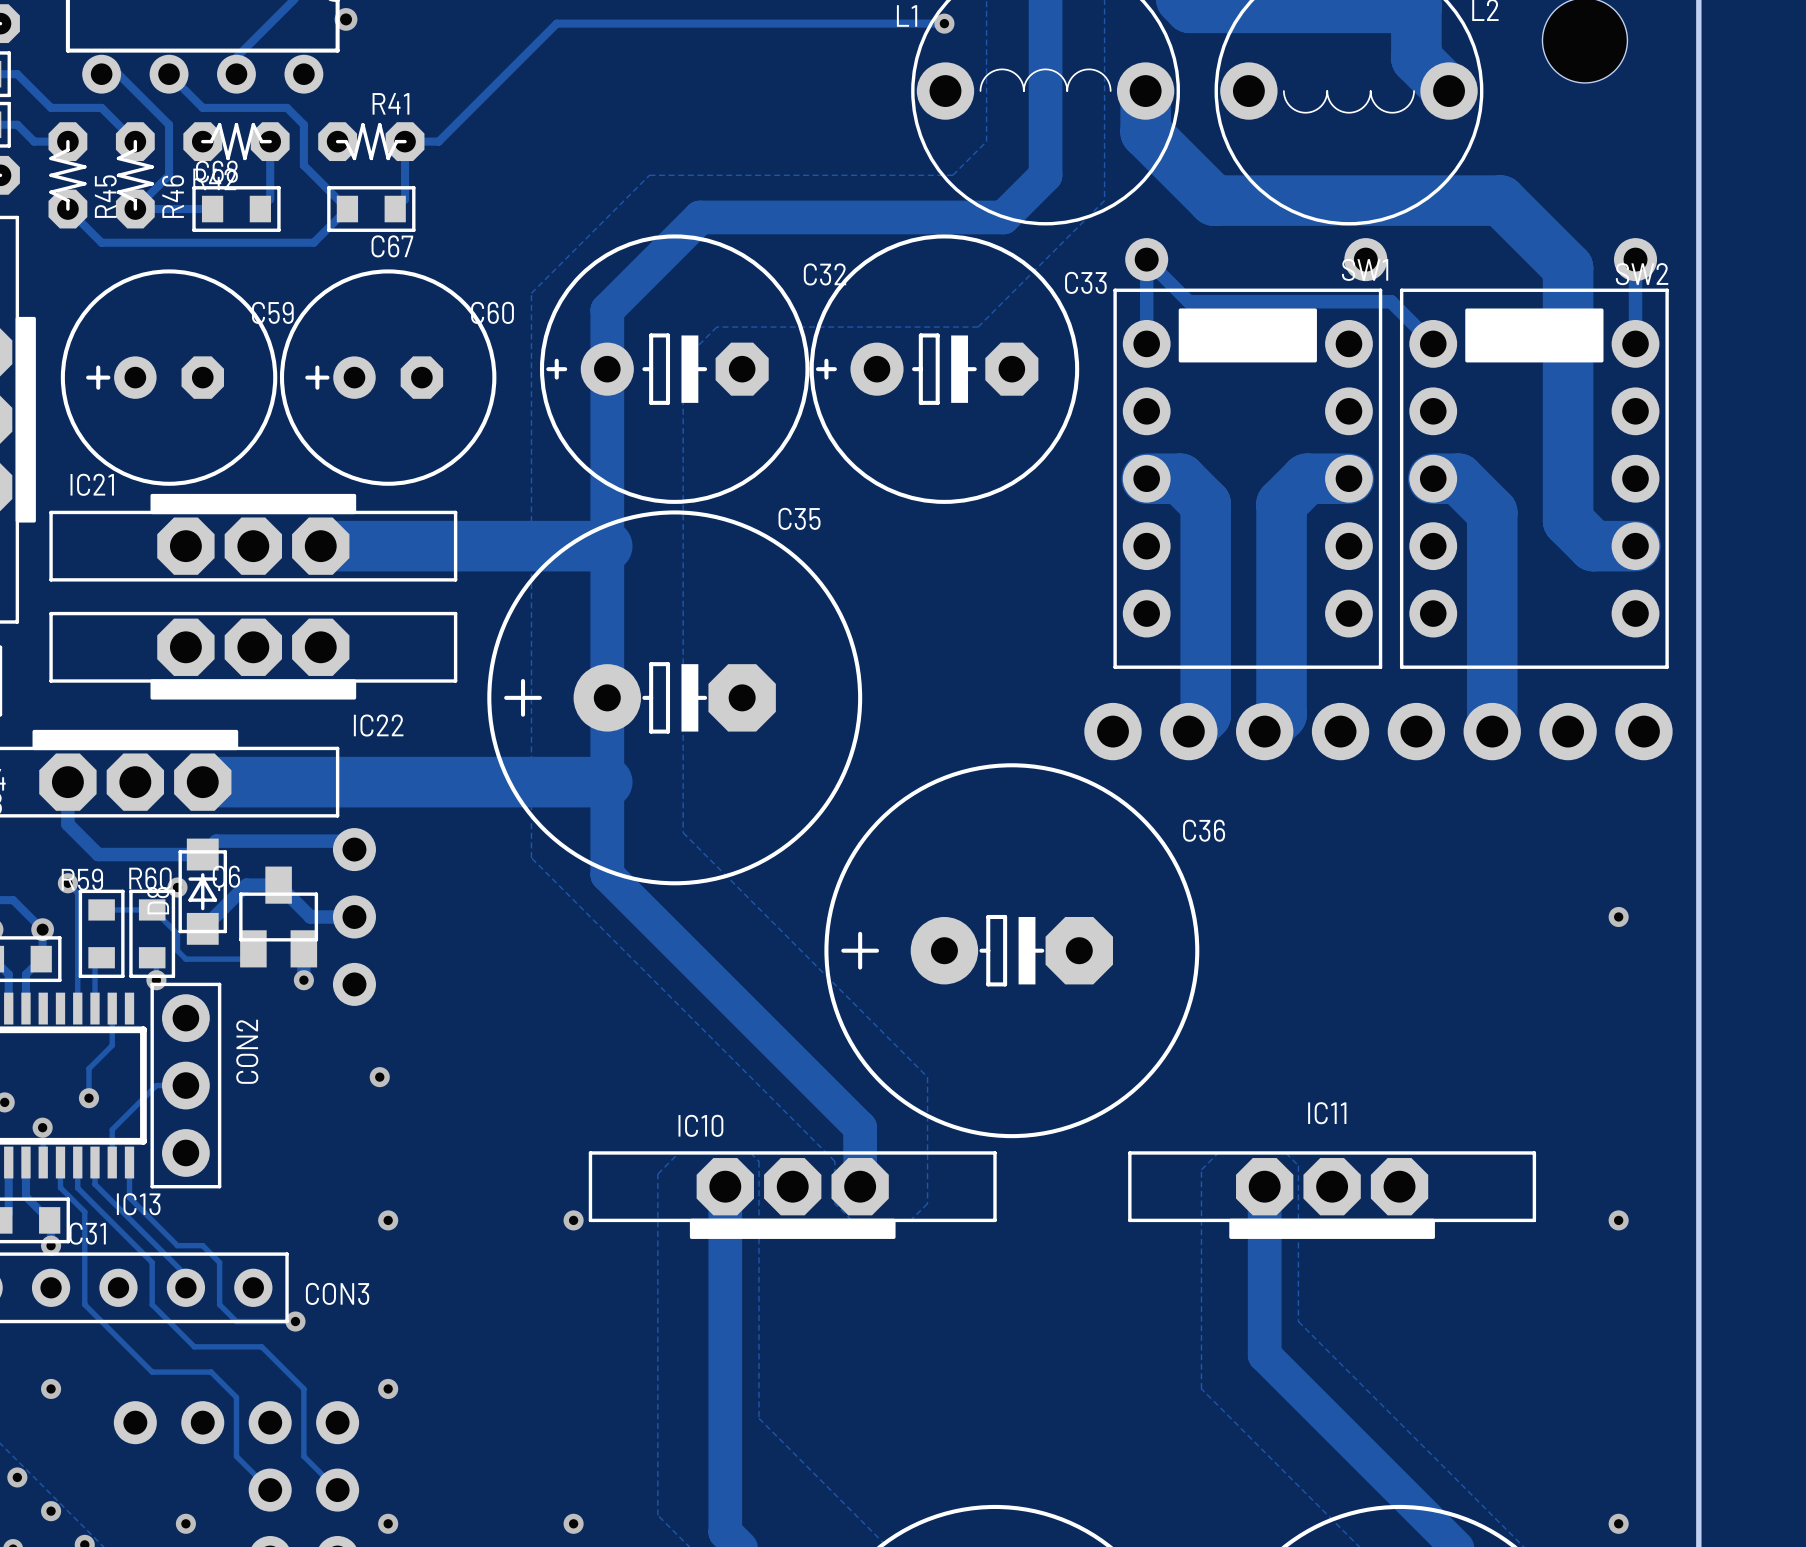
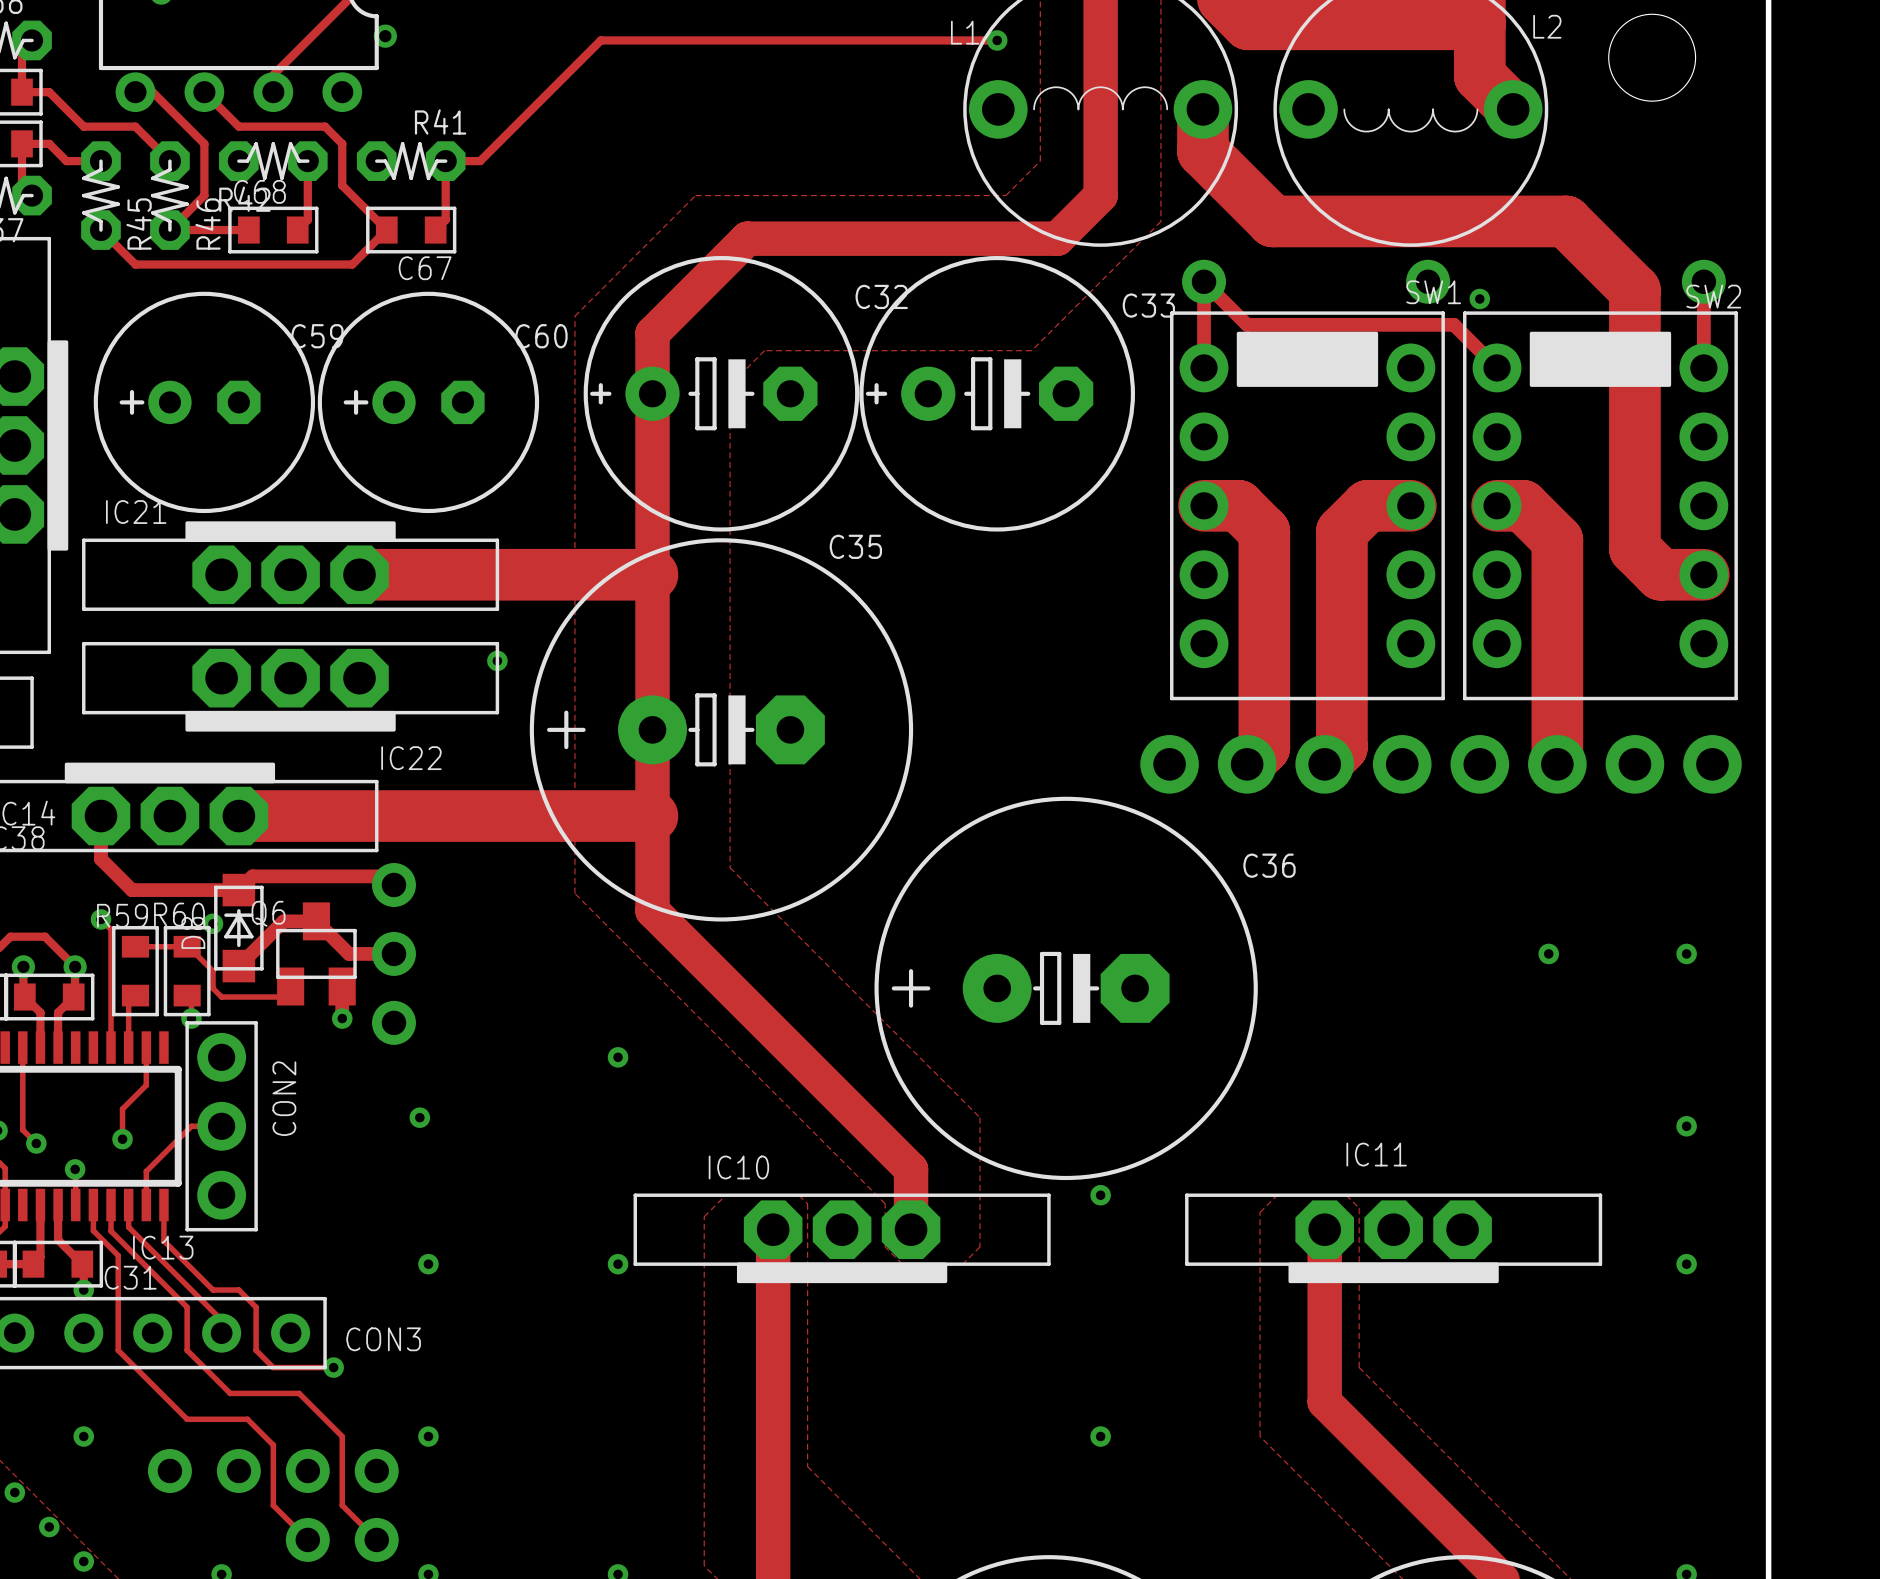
via: none -> (1479, 298)
via: none -> (497, 660)
via: none -> (1548, 953)
via: none -> (618, 1057)
via: none -> (1686, 1126)
via: none -> (1100, 1195)
via: none -> (1100, 1436)

